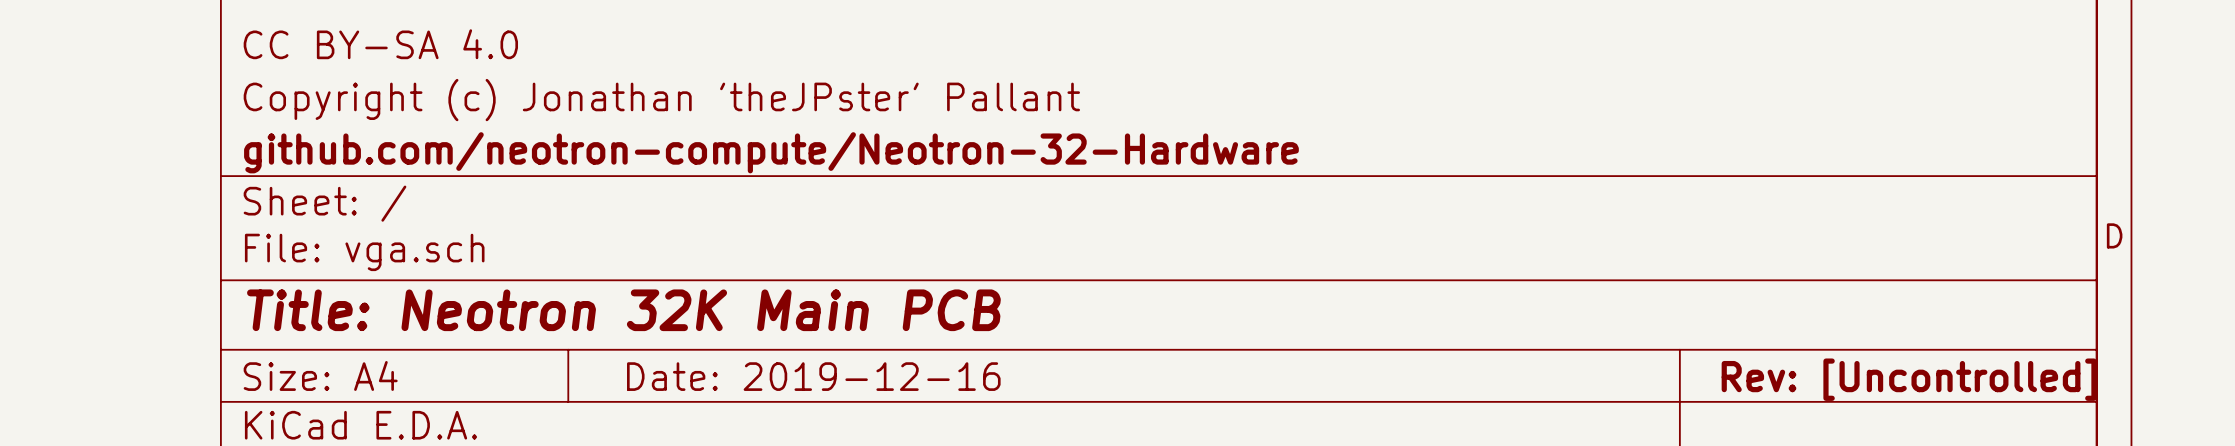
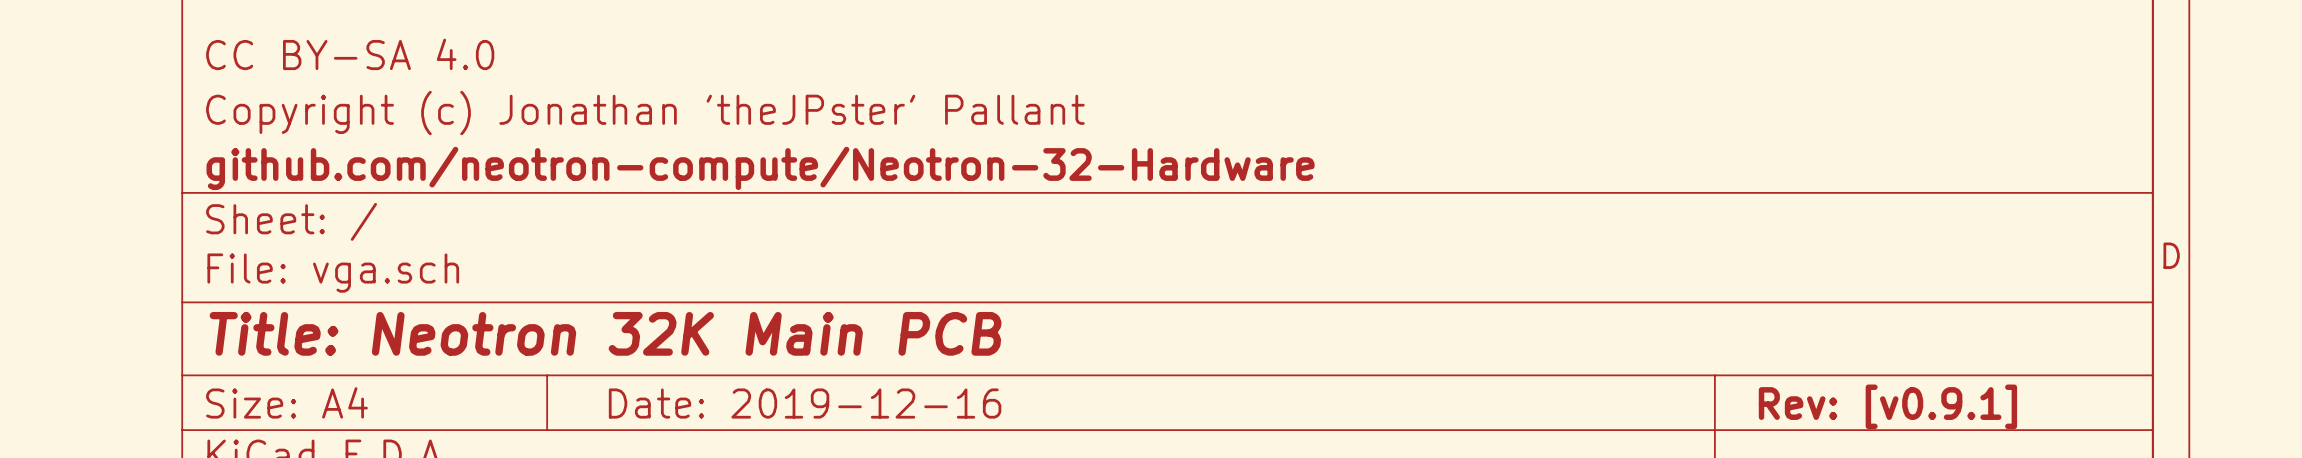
title block: Rev: [Uncontrolled] (1909, 379) -> Rev: [v0.9.1] (1887, 406)

